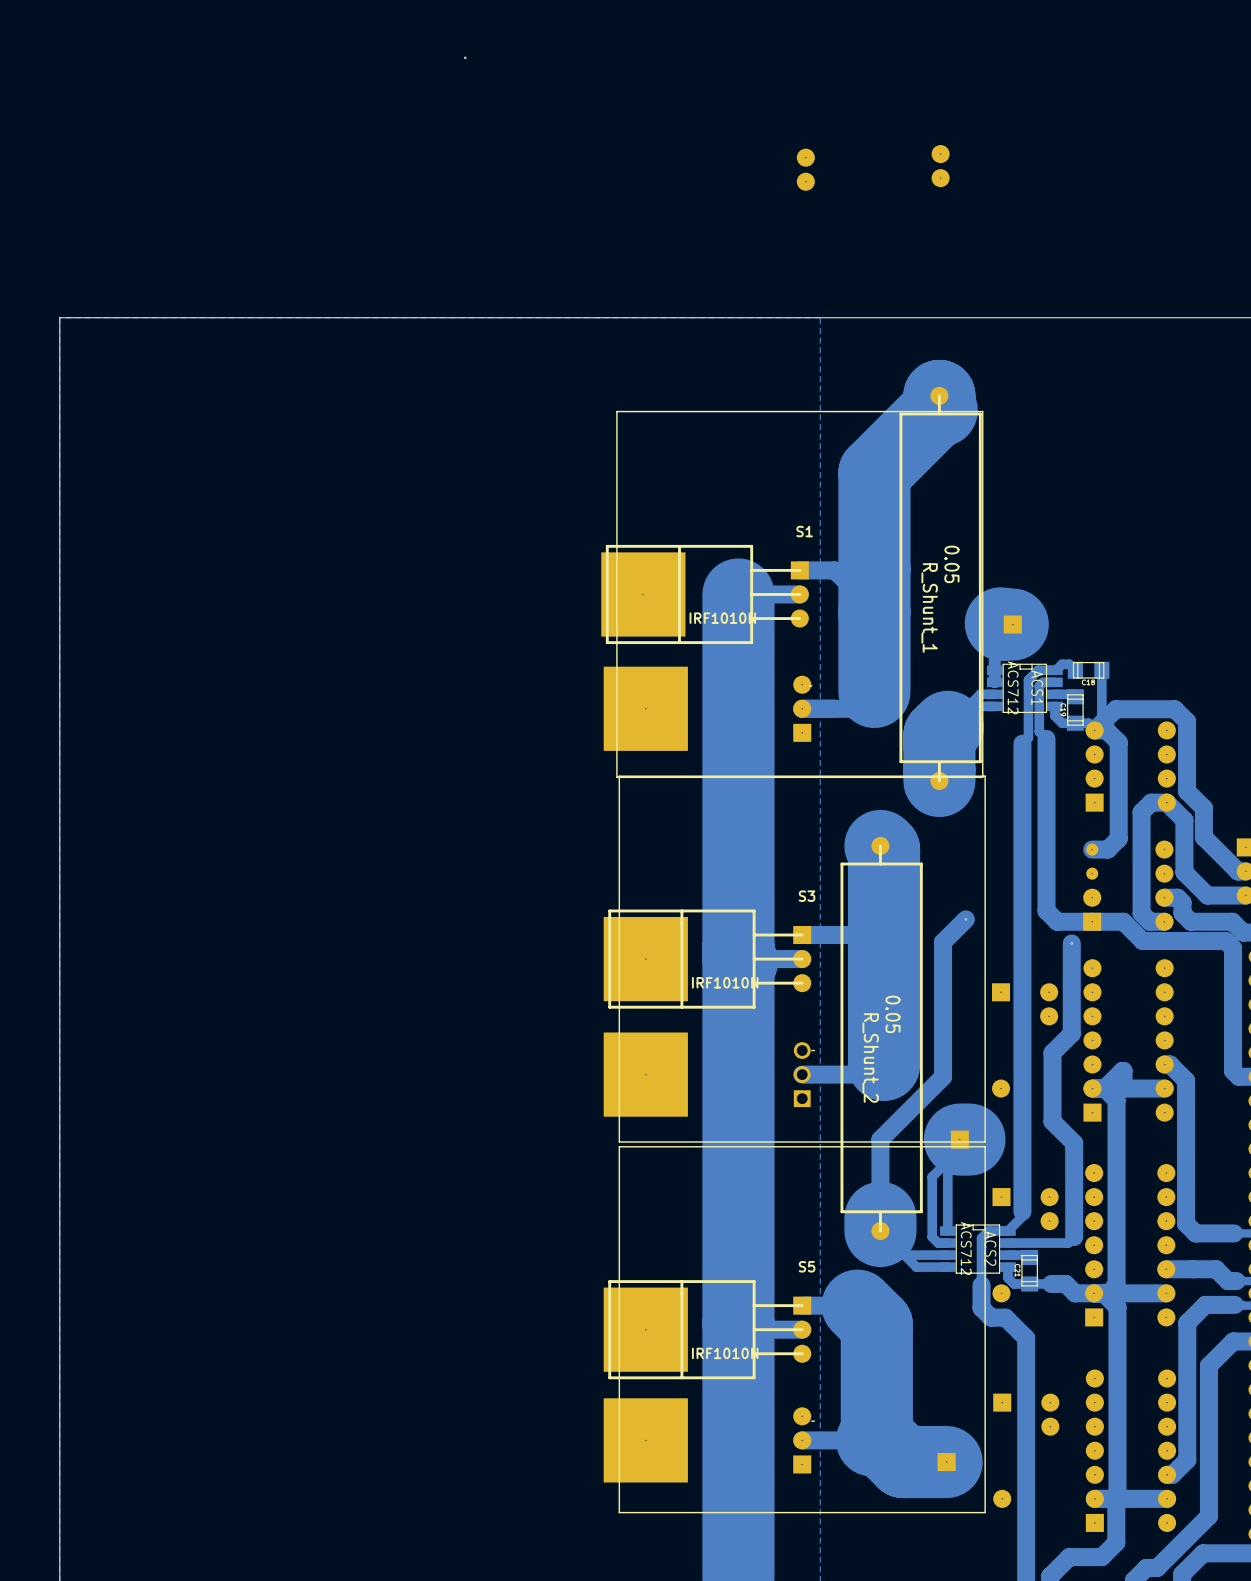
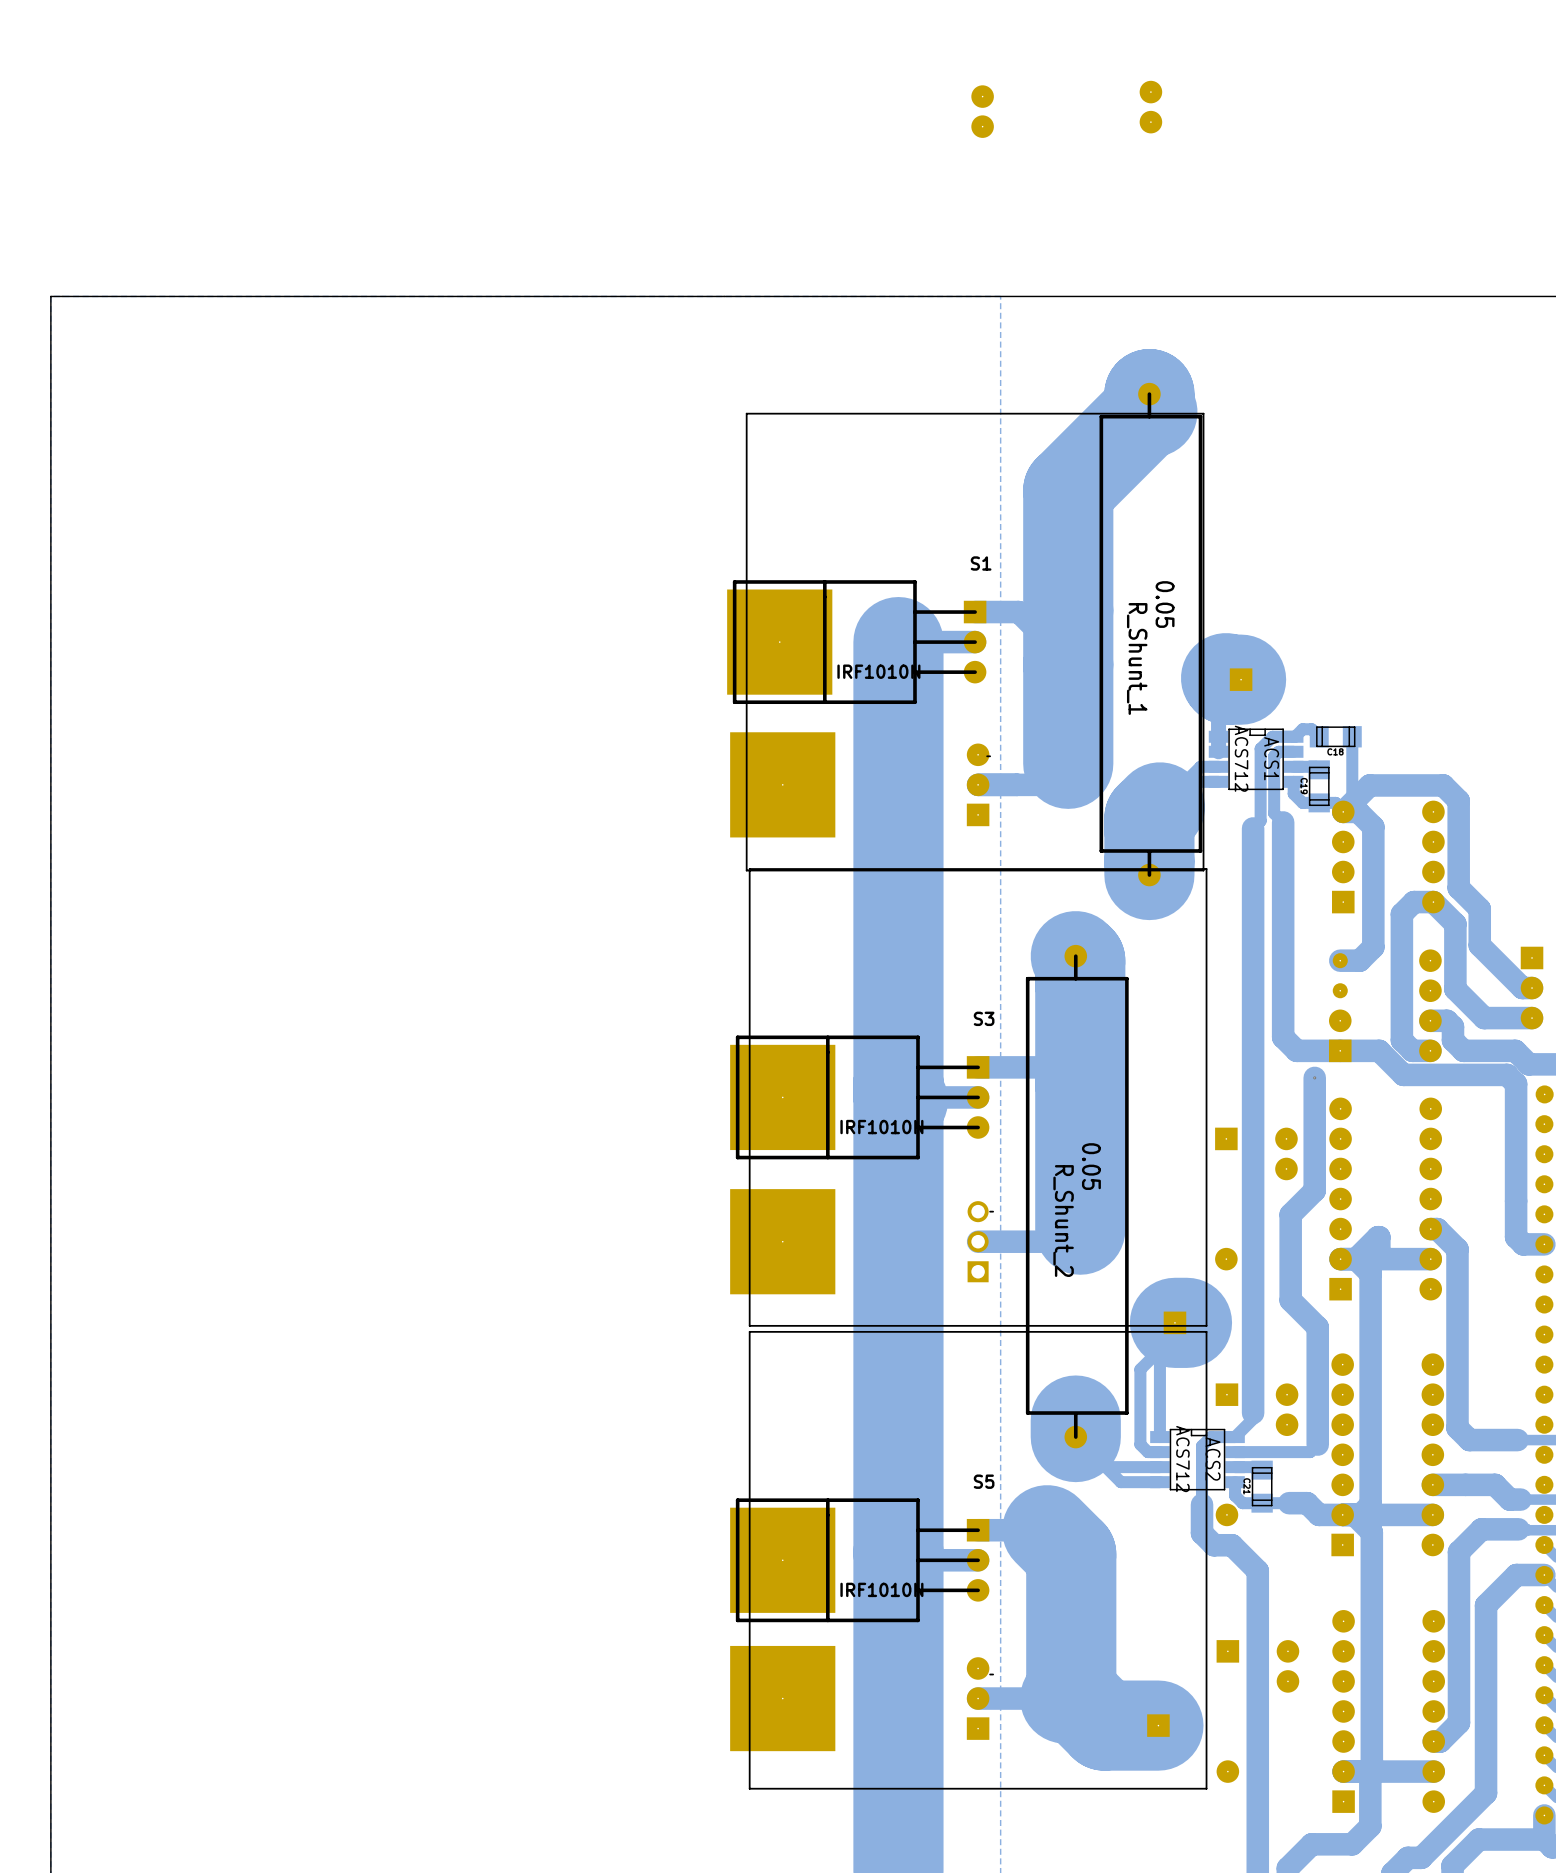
track: (965, 919) (943, 942) (943, 1077) (880, 1139) (880, 1231) -> none
via: (965, 919) -> none

